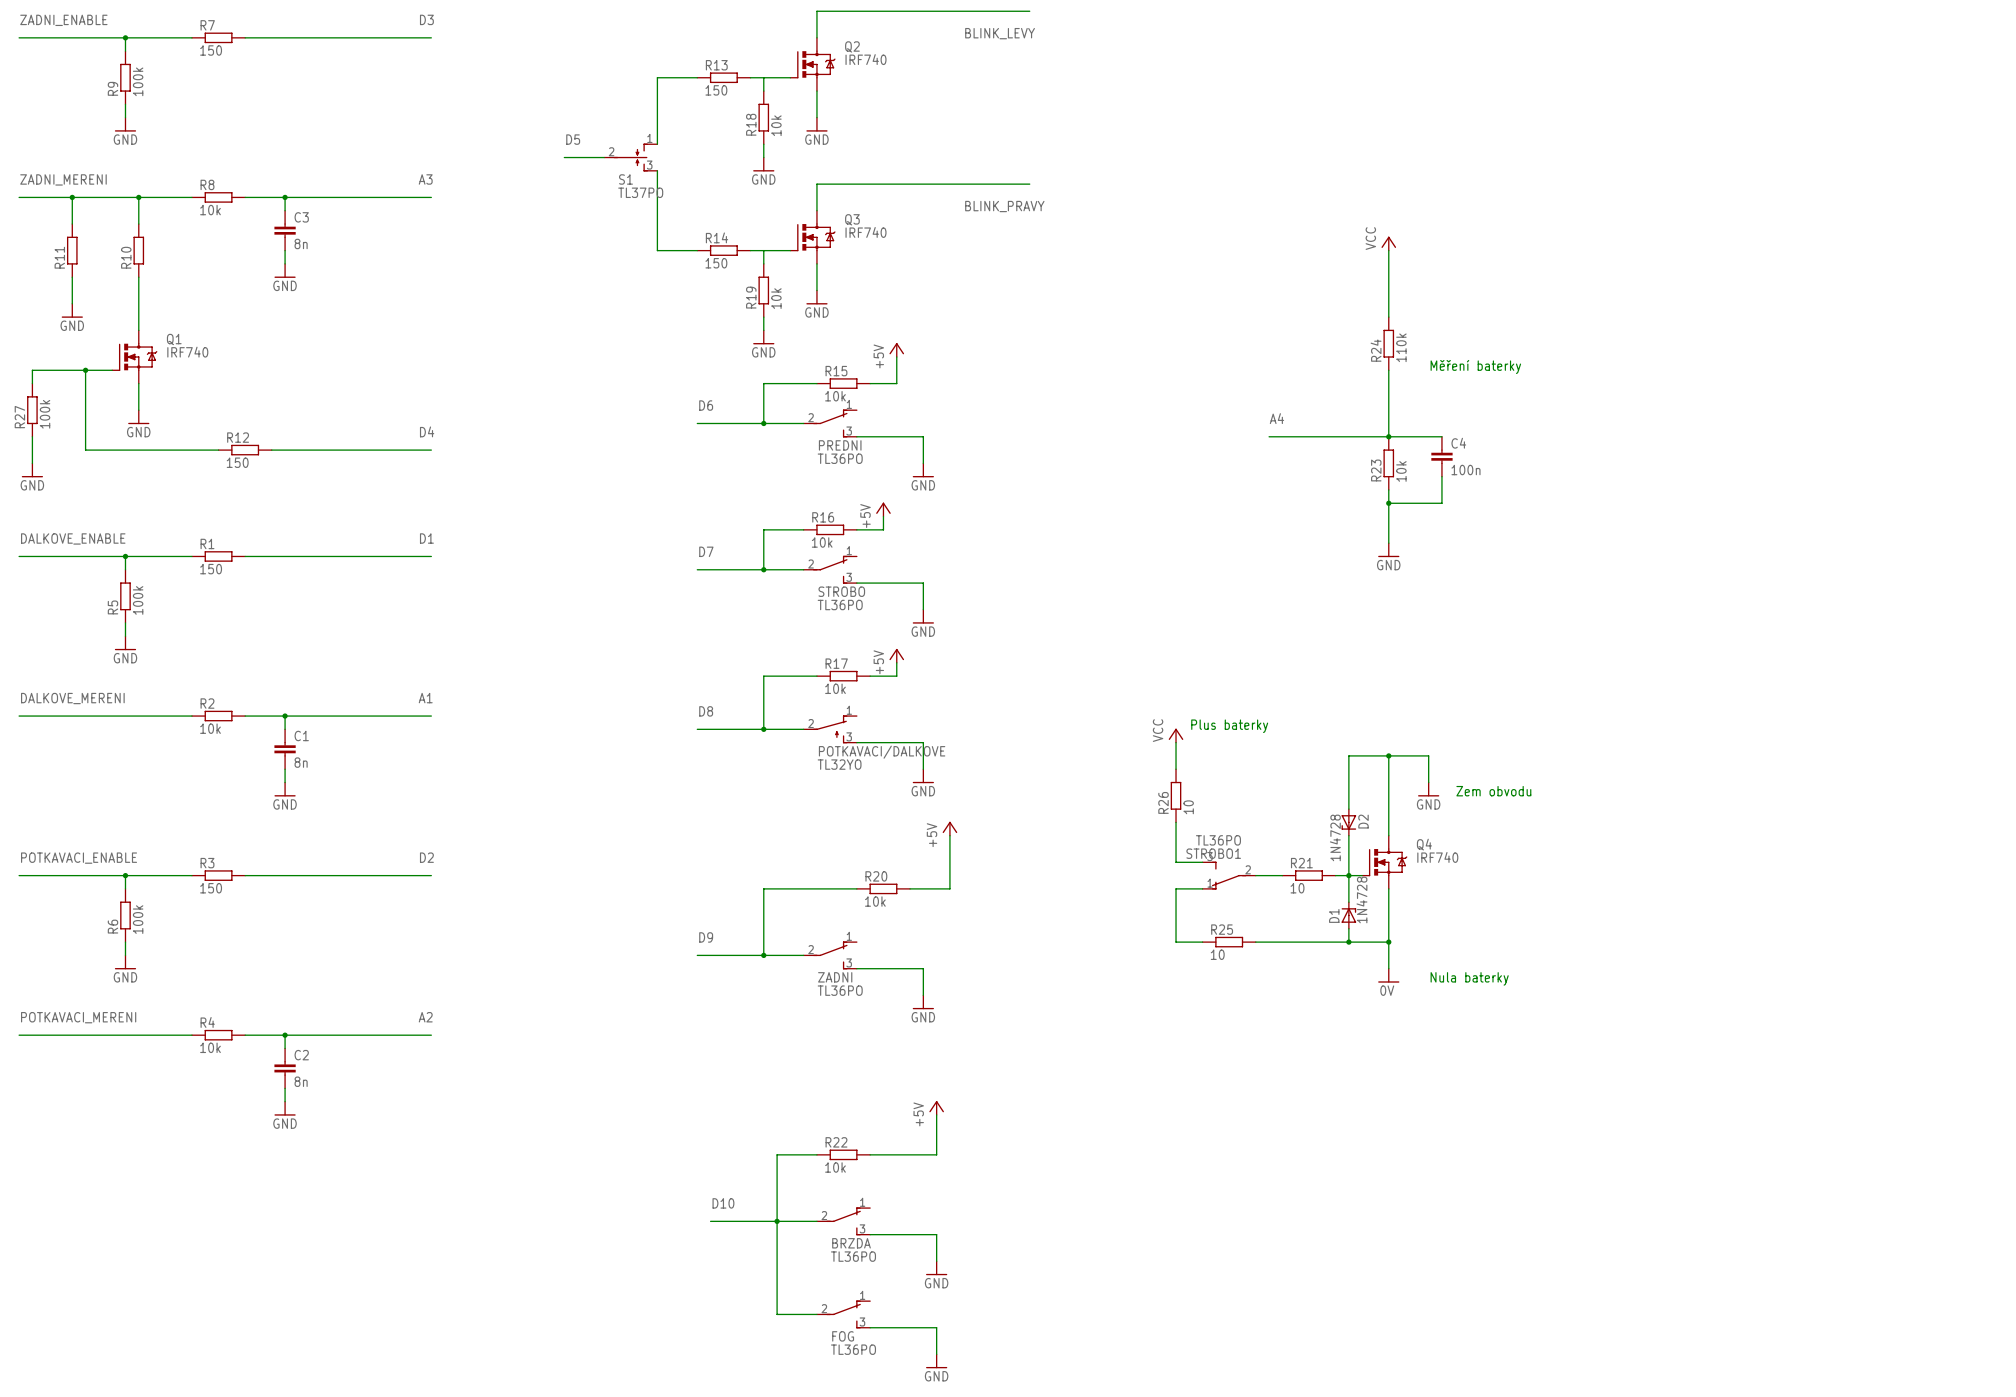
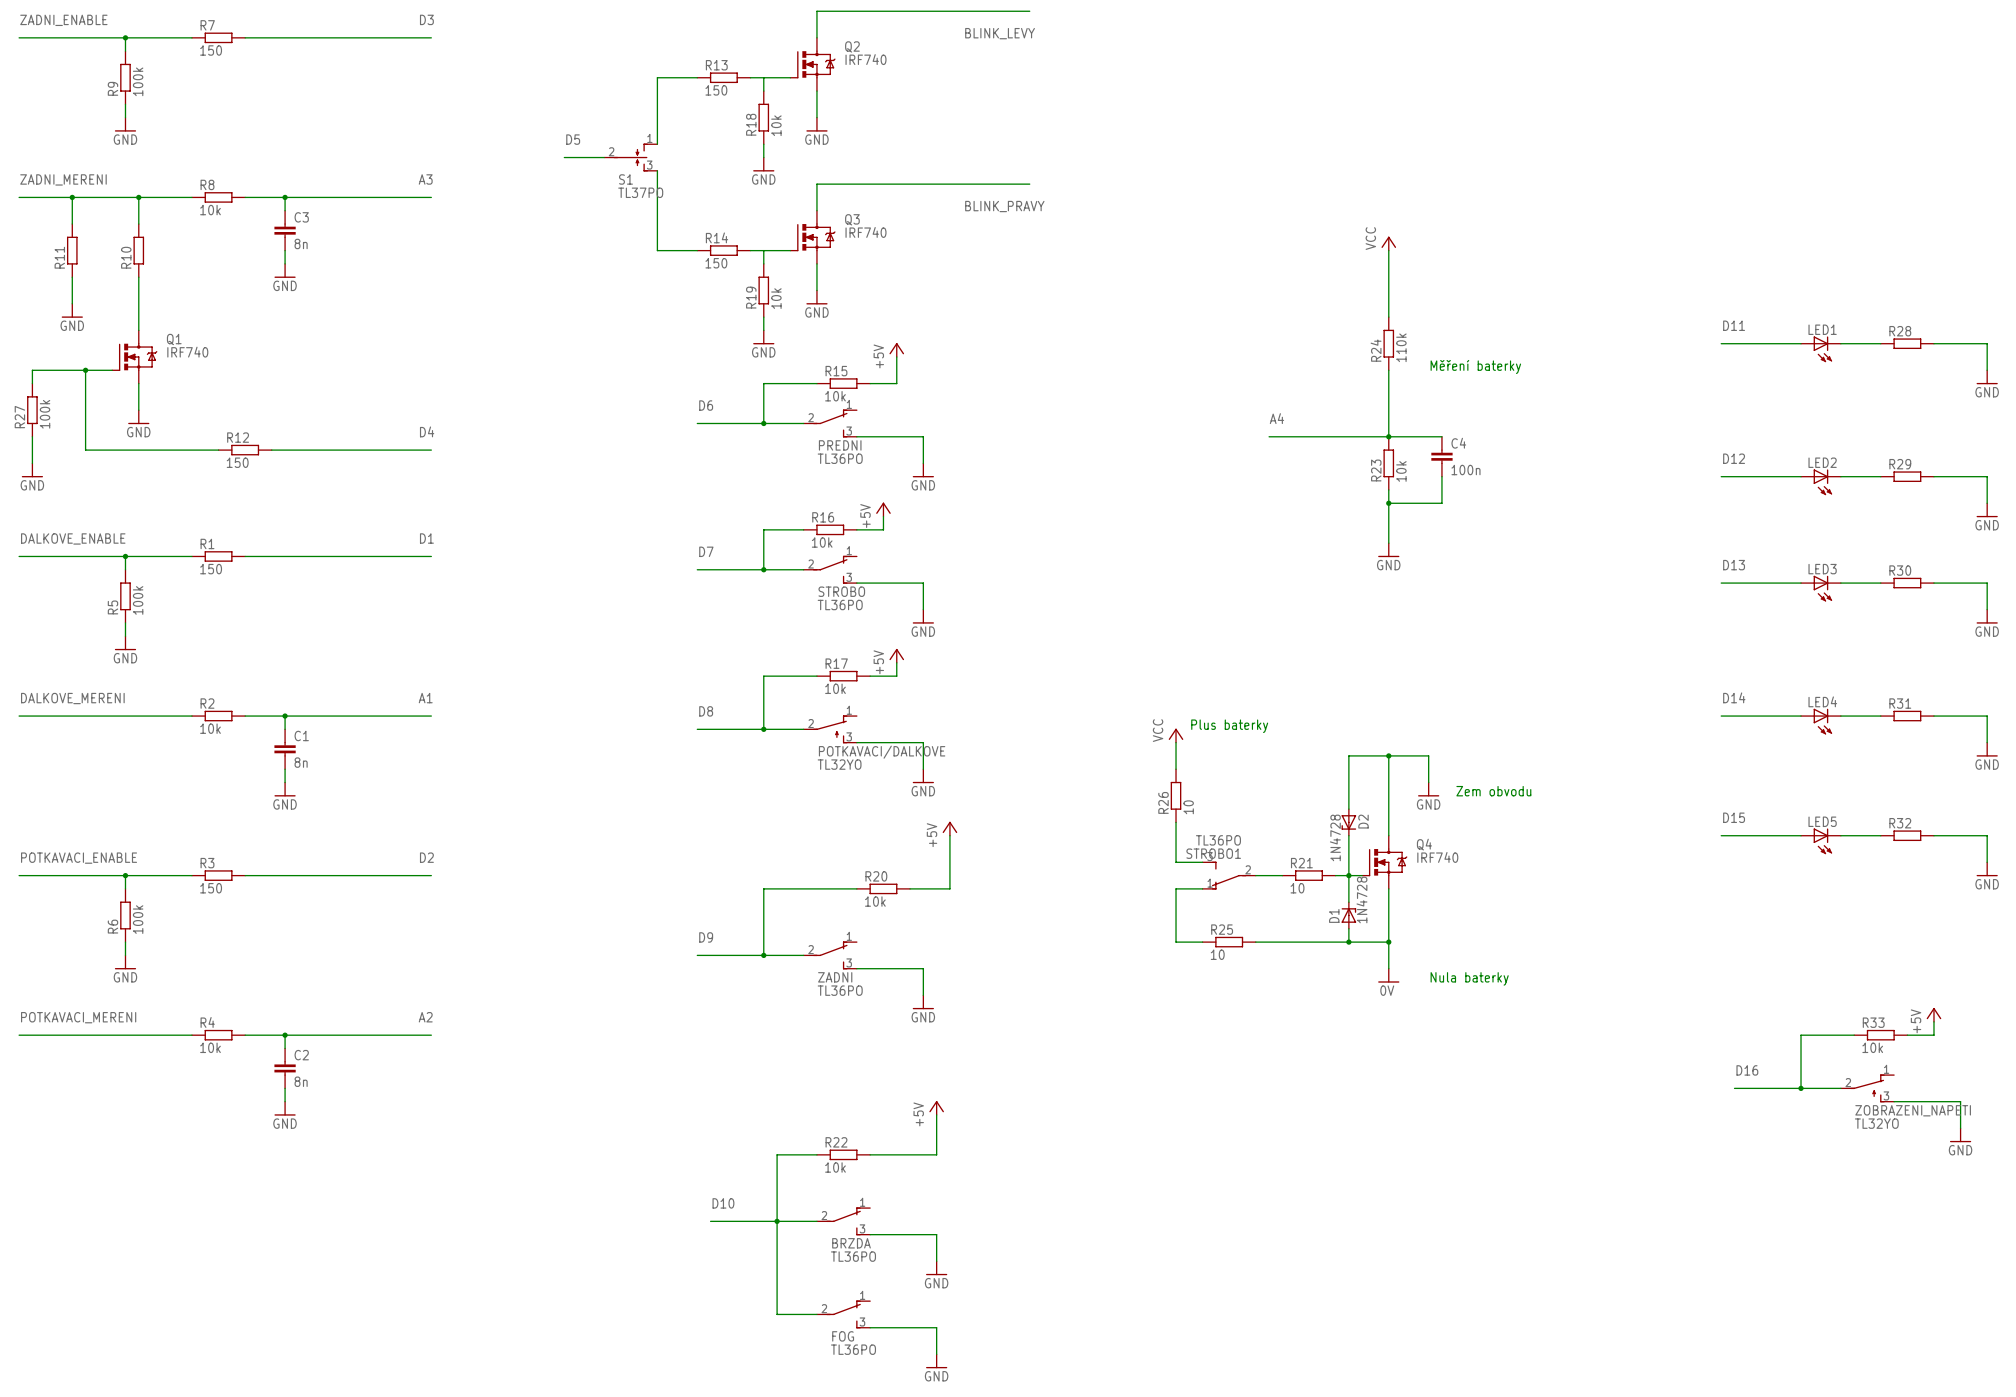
label: none -> D11 (1734, 325)
wire: none -> (1721, 343) (1801, 343)
wire: none -> (1840, 343) (1880, 343)
R28: none -> (1907, 343)
wire: none -> (1933, 343) (1987, 343) (1987, 370)
LED1: none -> (1820, 349)
power symbol: none -> GND (1987, 377)
label: none -> D12 (1734, 458)
wire: none -> (1721, 476) (1801, 476)
wire: none -> (1840, 476) (1880, 476)
R29: none -> (1907, 476)
wire: none -> (1933, 476) (1987, 476) (1987, 503)
LED2: none -> (1820, 482)
power symbol: none -> GND (1987, 510)
label: none -> D13 (1734, 565)
wire: none -> (1721, 583) (1801, 583)
wire: none -> (1840, 583) (1880, 583)
R30: none -> (1907, 583)
wire: none -> (1933, 583) (1987, 583) (1987, 609)
LED3: none -> (1820, 588)
power symbol: none -> GND (1987, 616)
label: none -> D14 (1734, 697)
wire: none -> (1721, 716) (1801, 716)
wire: none -> (1840, 716) (1880, 716)
R31: none -> (1907, 716)
wire: none -> (1933, 716) (1987, 716) (1987, 742)
LED4: none -> (1820, 721)
power symbol: none -> GND (1987, 749)
label: none -> D15 (1734, 817)
wire: none -> (1721, 835) (1801, 835)
wire: none -> (1840, 835) (1880, 835)
R32: none -> (1907, 835)
wire: none -> (1933, 835) (1987, 835) (1987, 862)
LED5: none -> (1820, 841)
power symbol: none -> GND (1987, 869)
power symbol: none -> +5V (1933, 1014)
wire: none -> (1933, 1021) (1933, 1035) (1907, 1035)
wire: none -> (1854, 1035) (1801, 1035) (1801, 1088)
R33: none -> 10k (1880, 1035)
label: none -> D16 (1747, 1070)
wire: none -> (1734, 1088) (1840, 1088)
junction: none -> (1801, 1088)
ZOBRAZENI_NAPETI: none -> TL32YO (1867, 1088)
wire: none -> (1894, 1101) (1960, 1101) (1960, 1128)
power symbol: none -> GND (1960, 1135)

